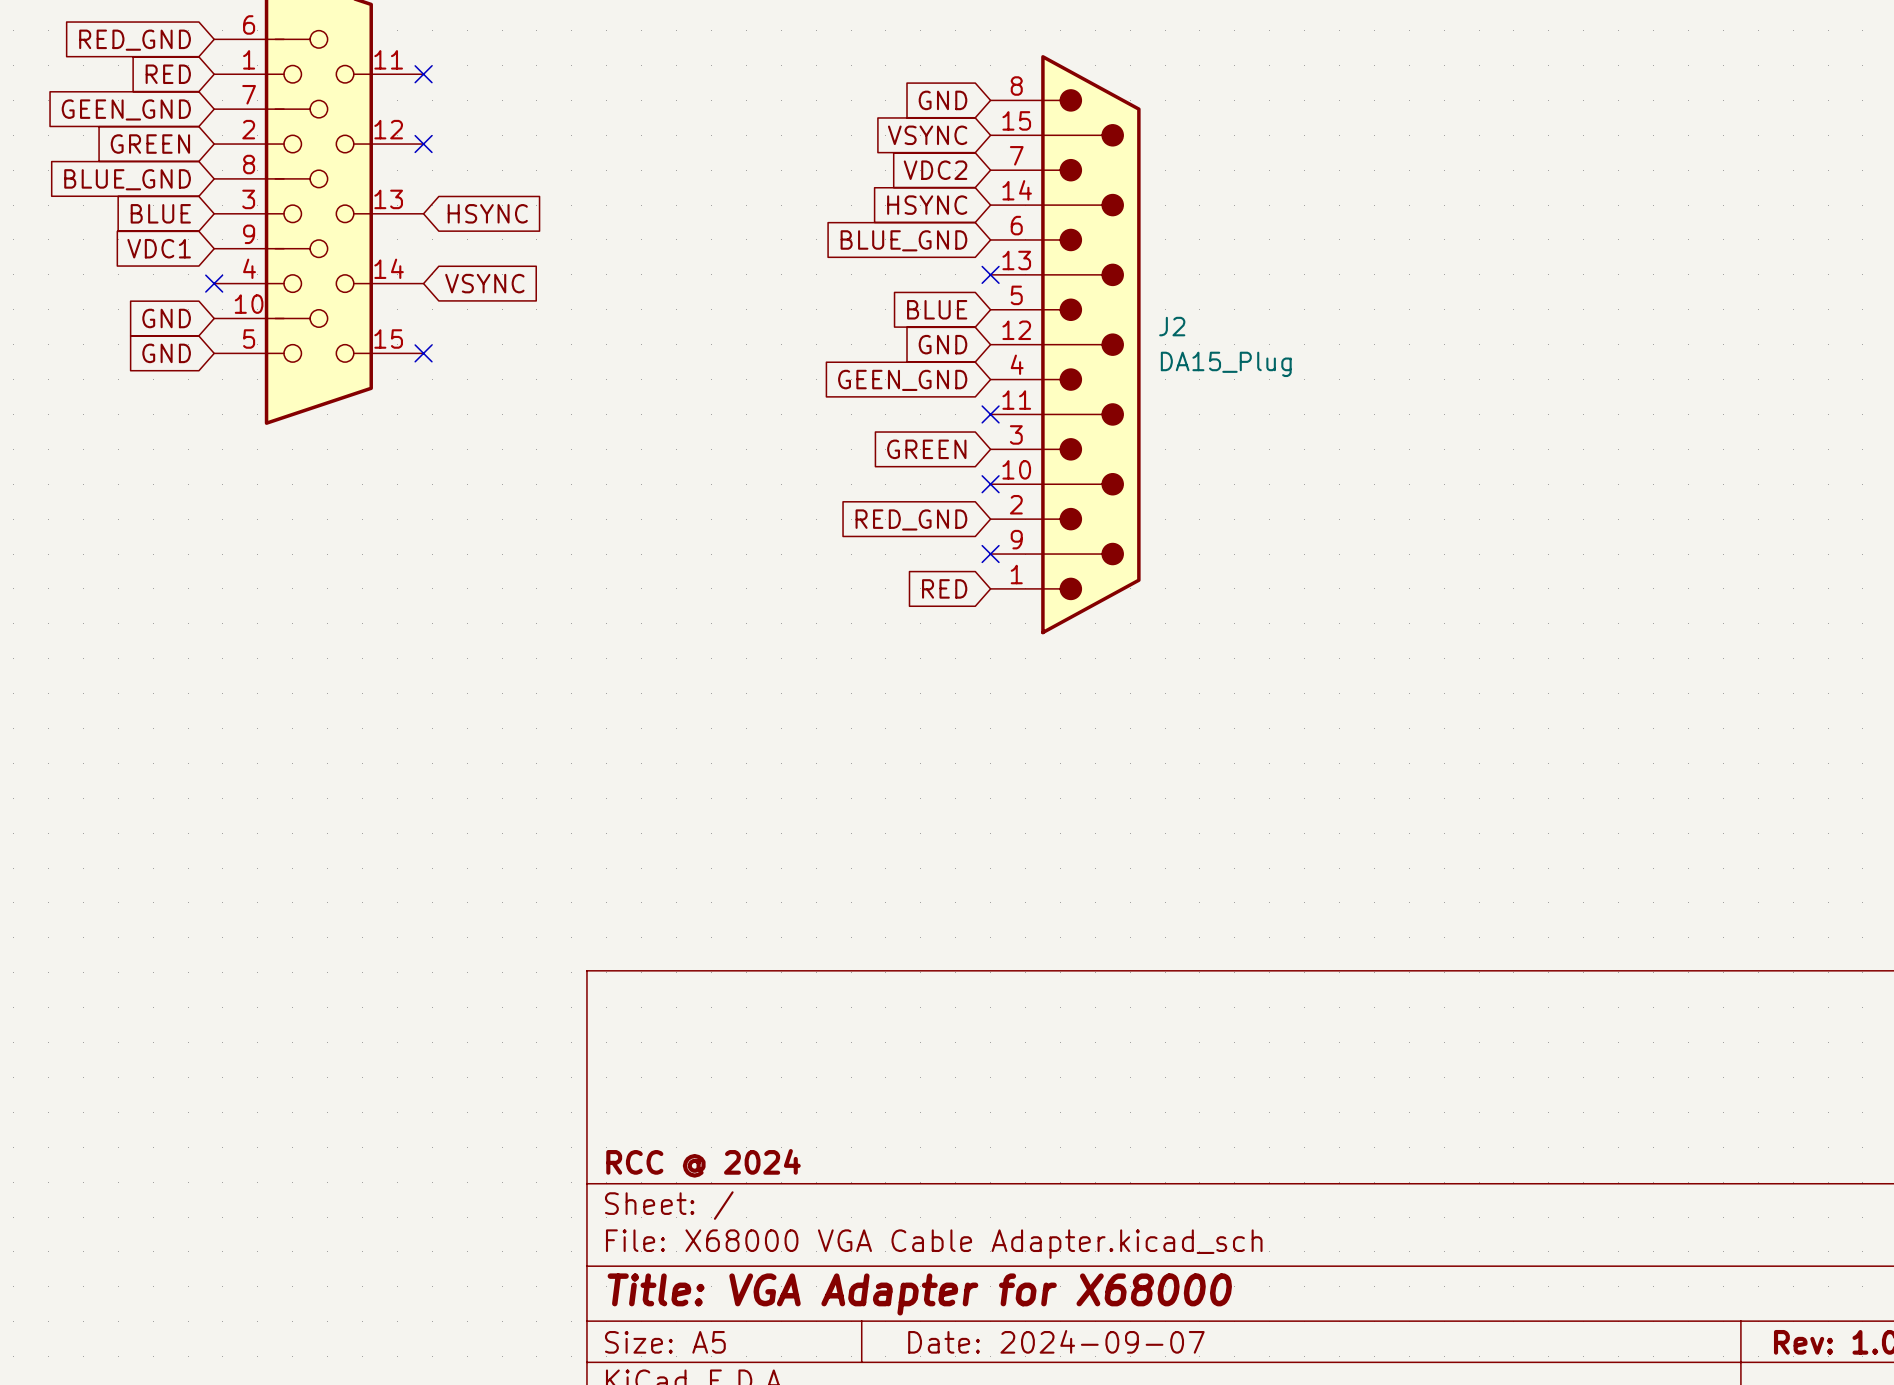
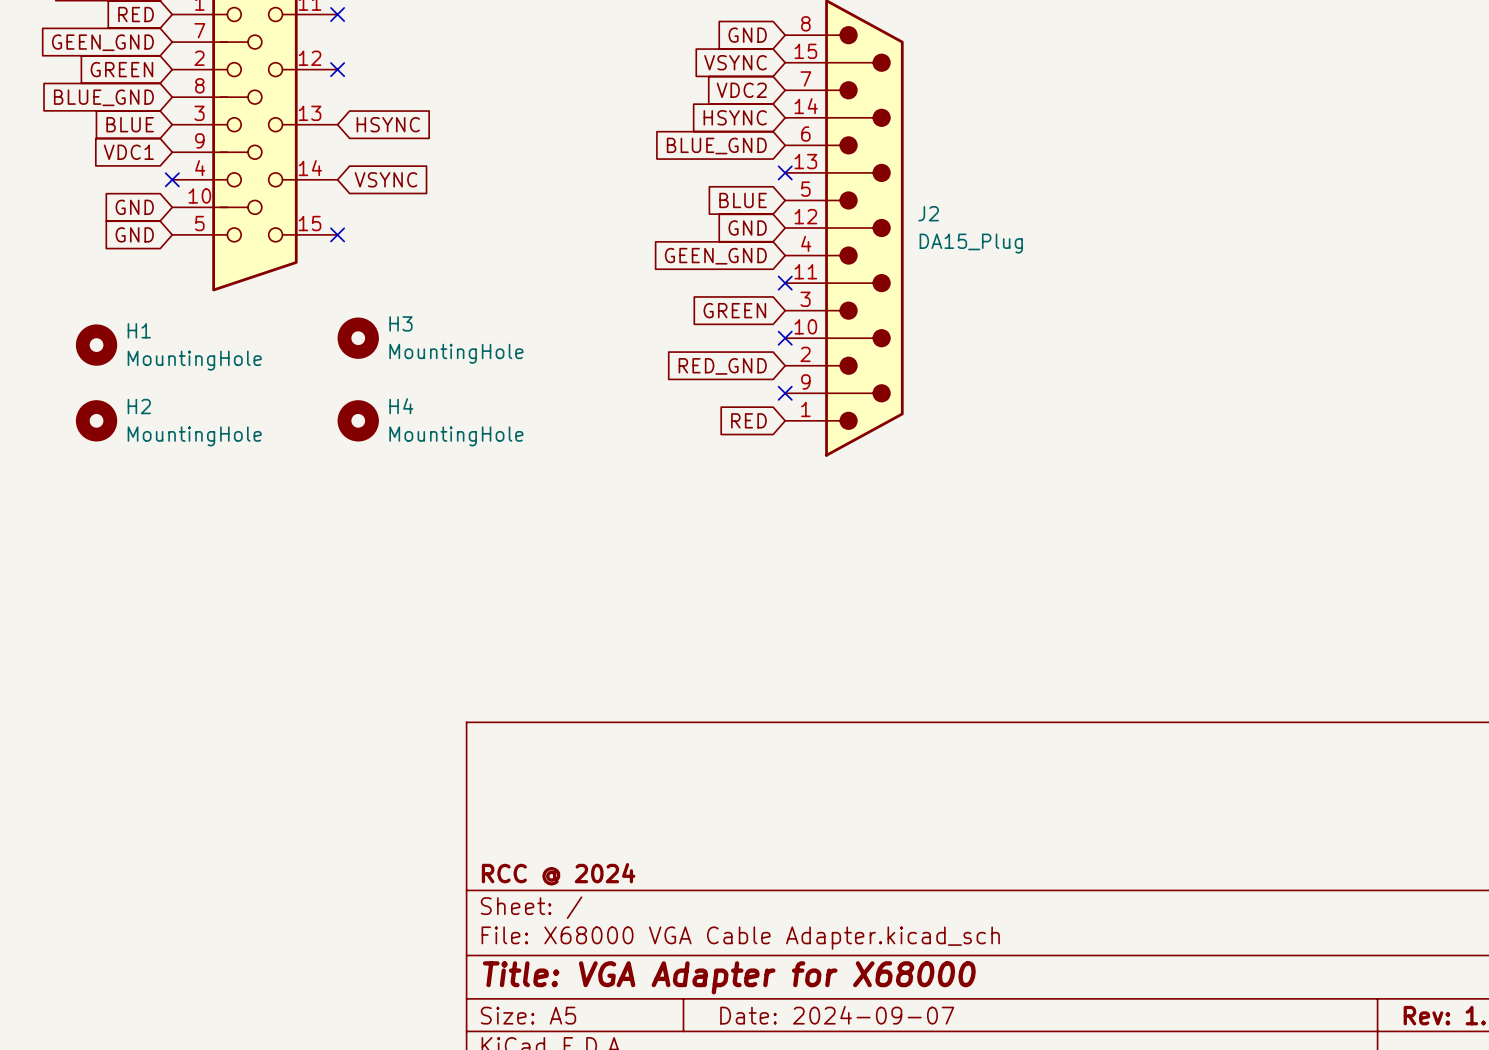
H3: none -> MountingHole (358, 338)
H1: none -> MountingHole (96, 345)
H2: none -> MountingHole (96, 420)
H4: none -> MountingHole (358, 420)

